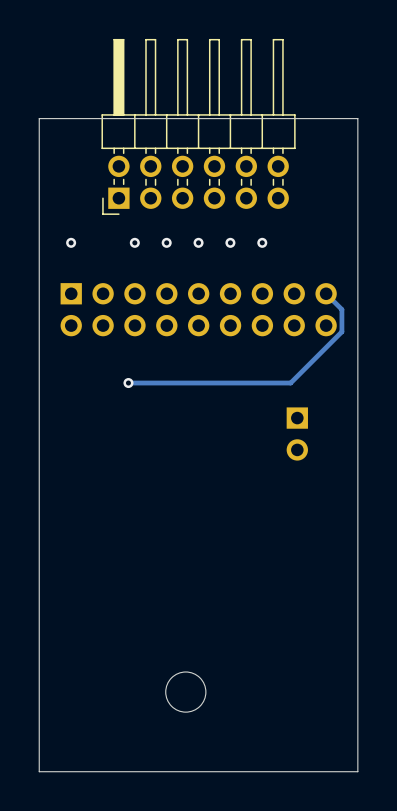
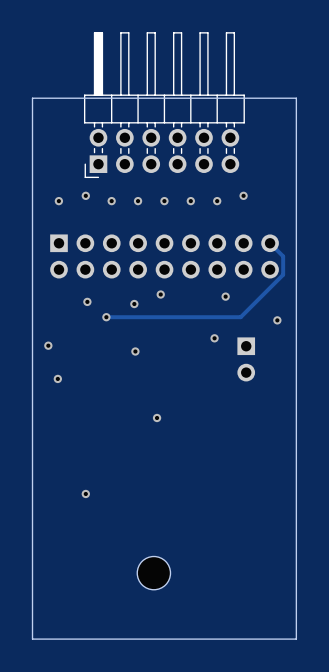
via: none -> (85, 195)
via: none -> (243, 195)
via: none -> (160, 294)
via: none -> (225, 296)
via: none -> (87, 301)
via: none -> (134, 304)
via: none -> (277, 320)
via: none -> (214, 338)
via: none -> (48, 345)
via: none -> (135, 351)
via: none -> (57, 378)
via: none -> (157, 417)
via: none -> (85, 493)

